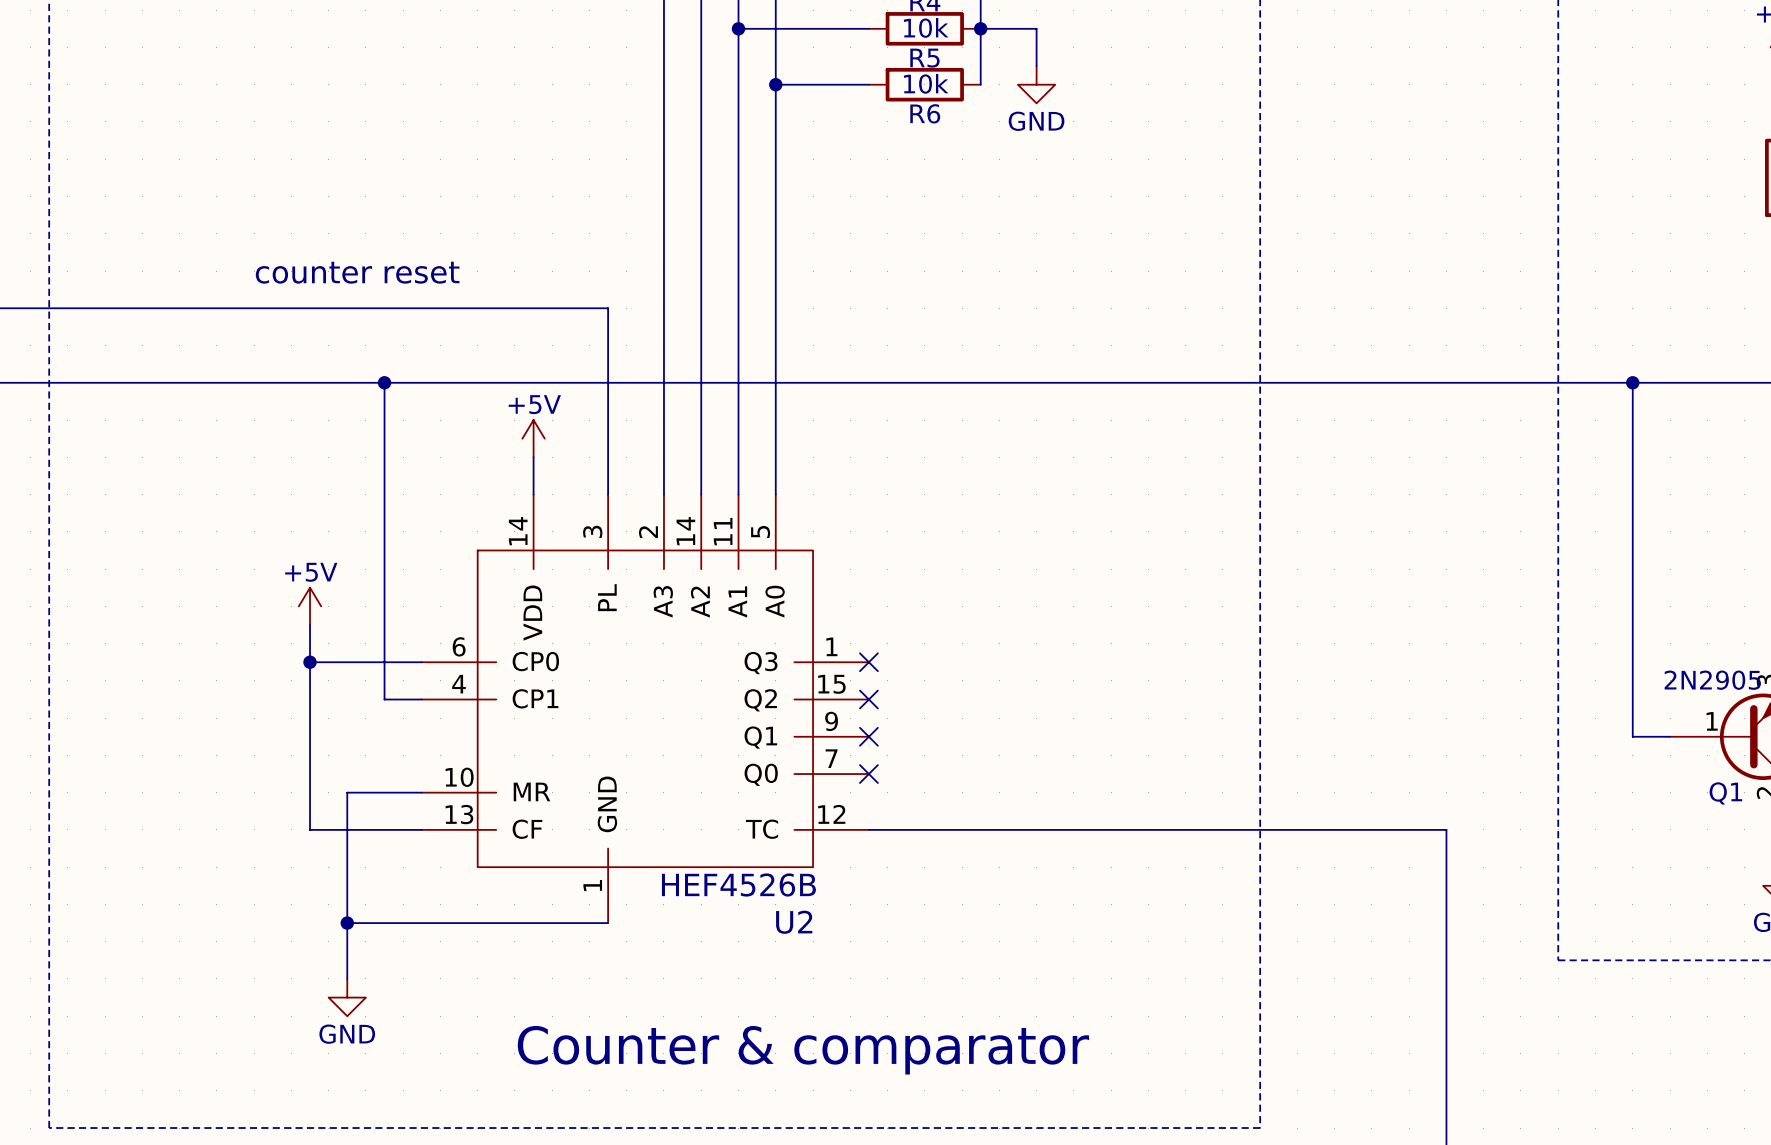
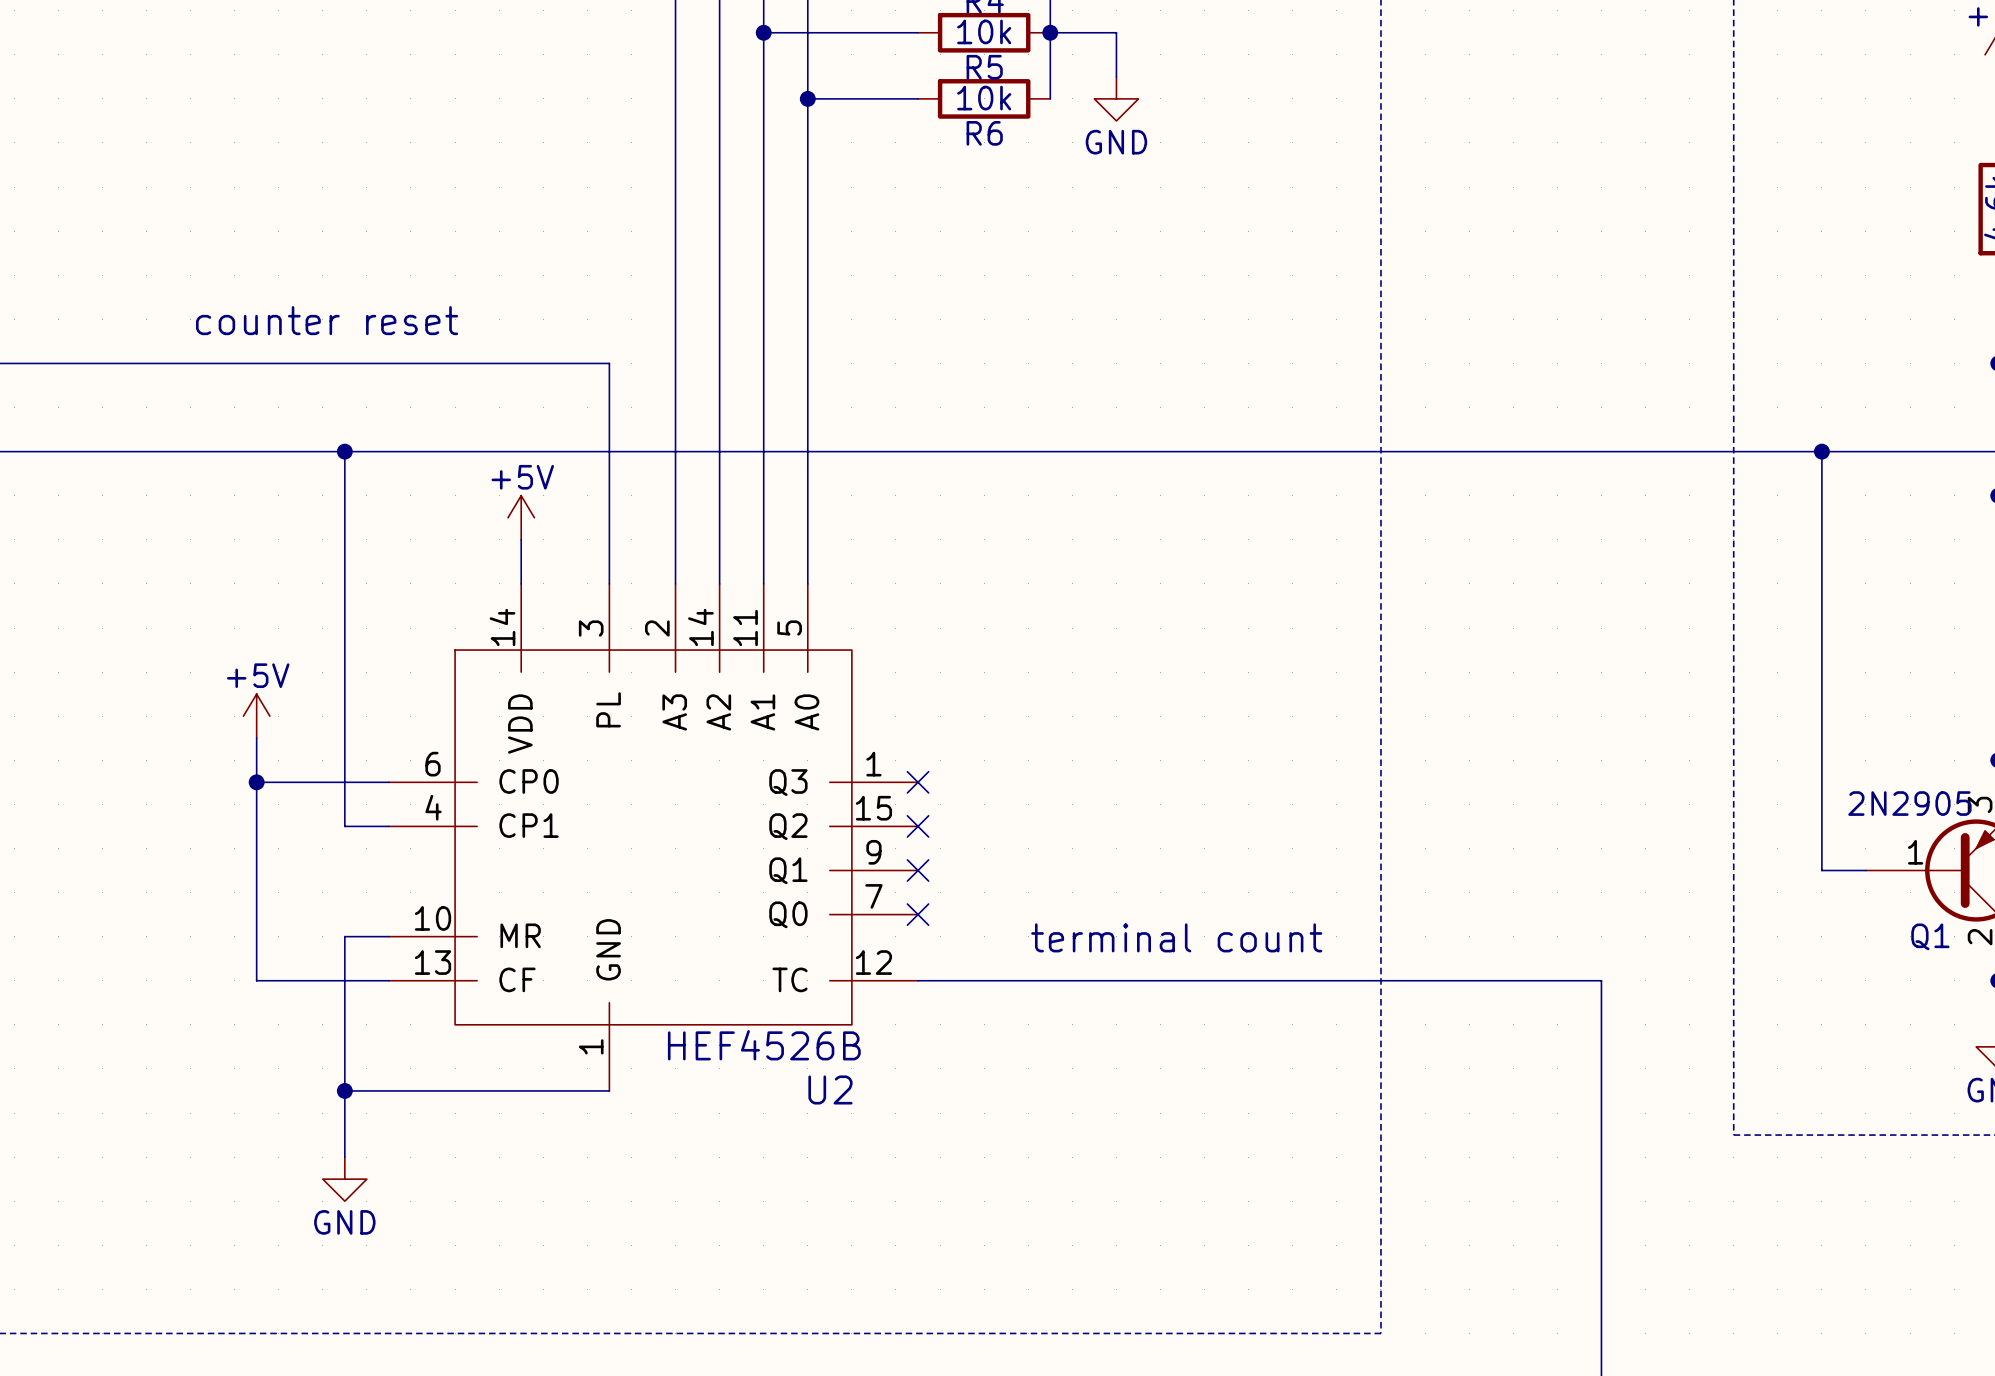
wire: (384, 792) (347, 792) (347, 978) -> (344, 936) (344, 1157)
text: none -> terminal count (1176, 937)
wire: (347, 923) (384, 923) -> none
junction position: (347, 923) -> (344, 1090)
power symbol position: GND (347, 997) -> GND (344, 1179)
text: Counter & comparator (803, 1050) -> none

